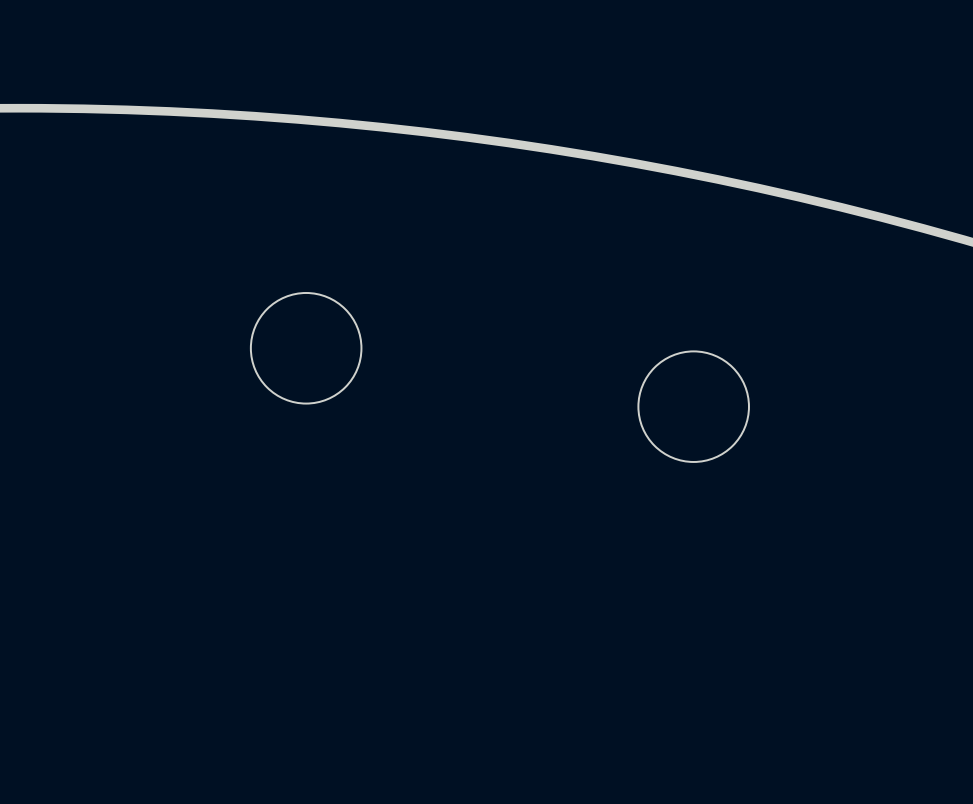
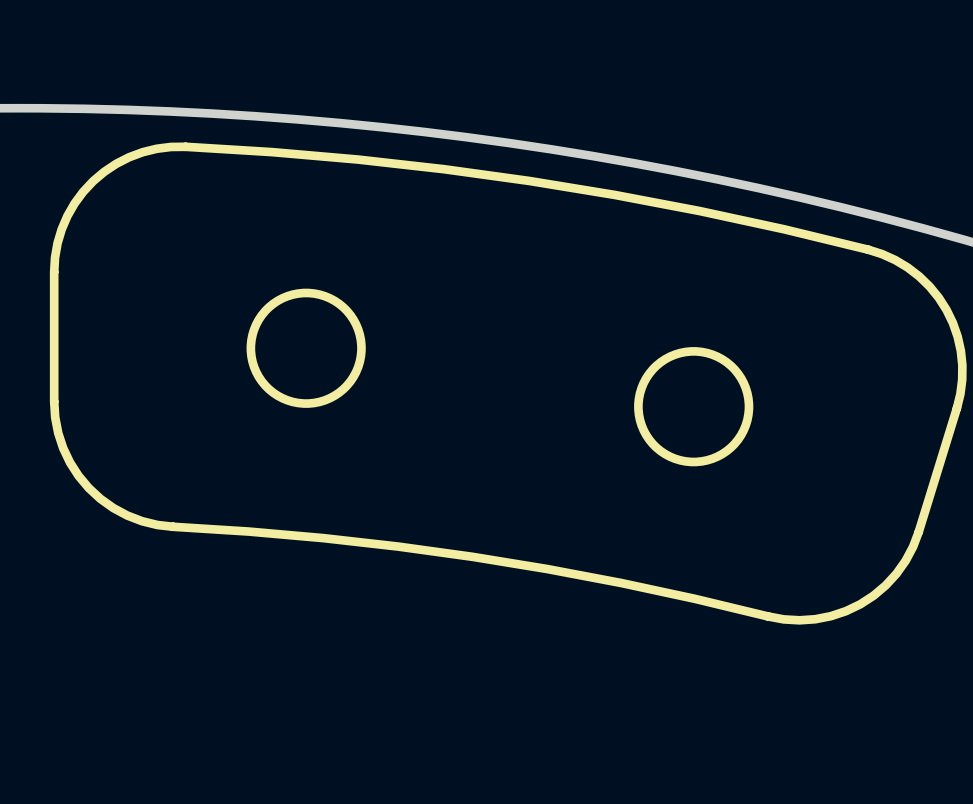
line: none -> (185, 146) (358, 159) (529, 180) (614, 194) (784, 229) (868, 249) (895, 260) (919, 276) (938, 297) (946, 309) (957, 336) (962, 365) (962, 379) (956, 408) (918, 531) (905, 560) (885, 585) (873, 595) (846, 611) (815, 619) (783, 619) (621, 583) (547, 569) (398, 546) (323, 538) (157, 524) (127, 515) (113, 507) (100, 498) (78, 475) (69, 462) (58, 433) (54, 401) (54, 272) (57, 243) (67, 216) (74, 203) (93, 181) (104, 171) (129, 157) (142, 152) (171, 146) (185, 146)
drawing: none -> [246, 288, 366, 408]
drawing: none -> [634, 347, 754, 467]

